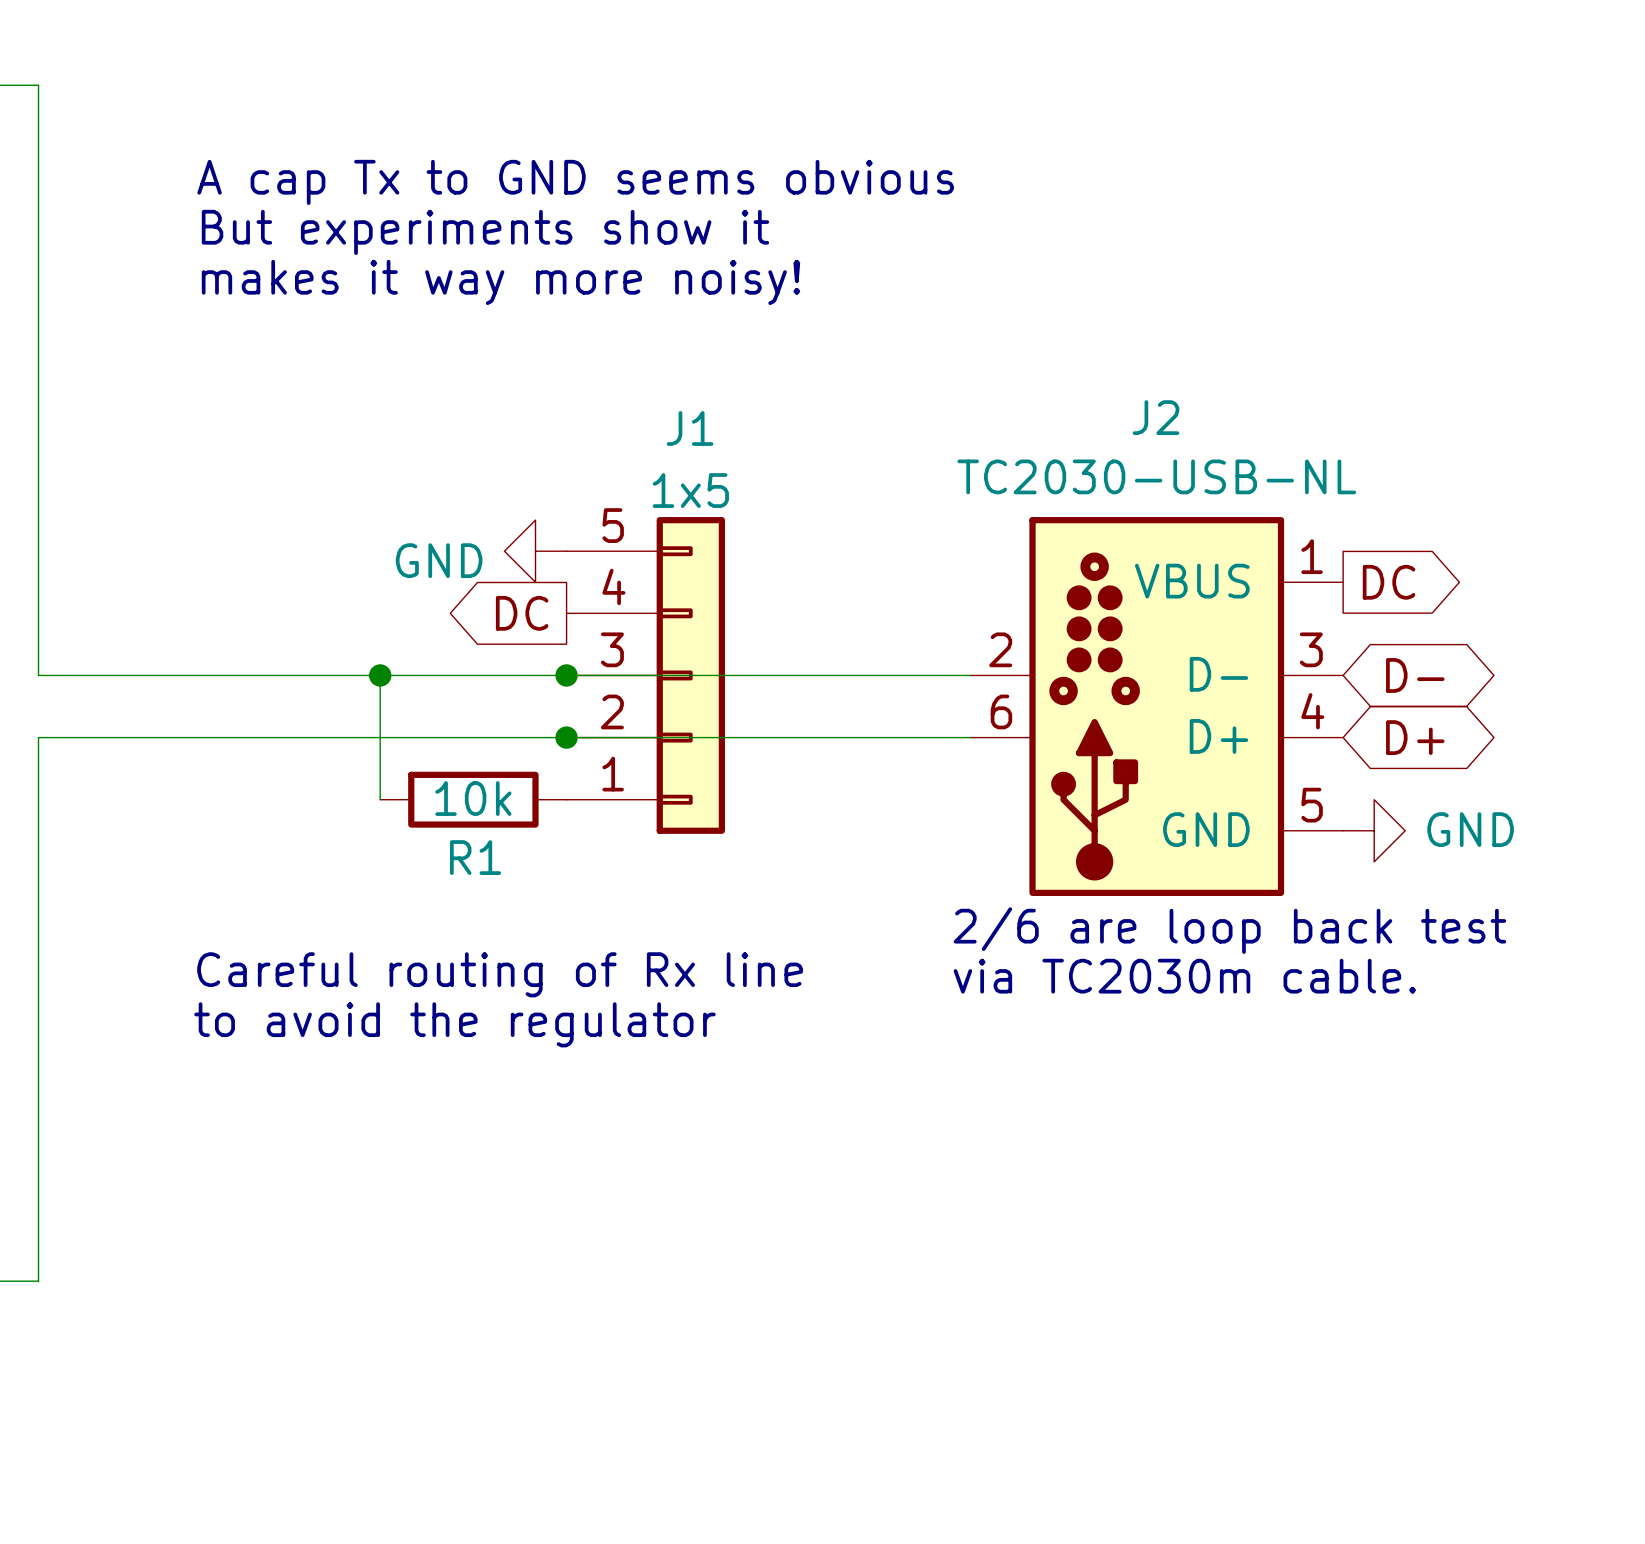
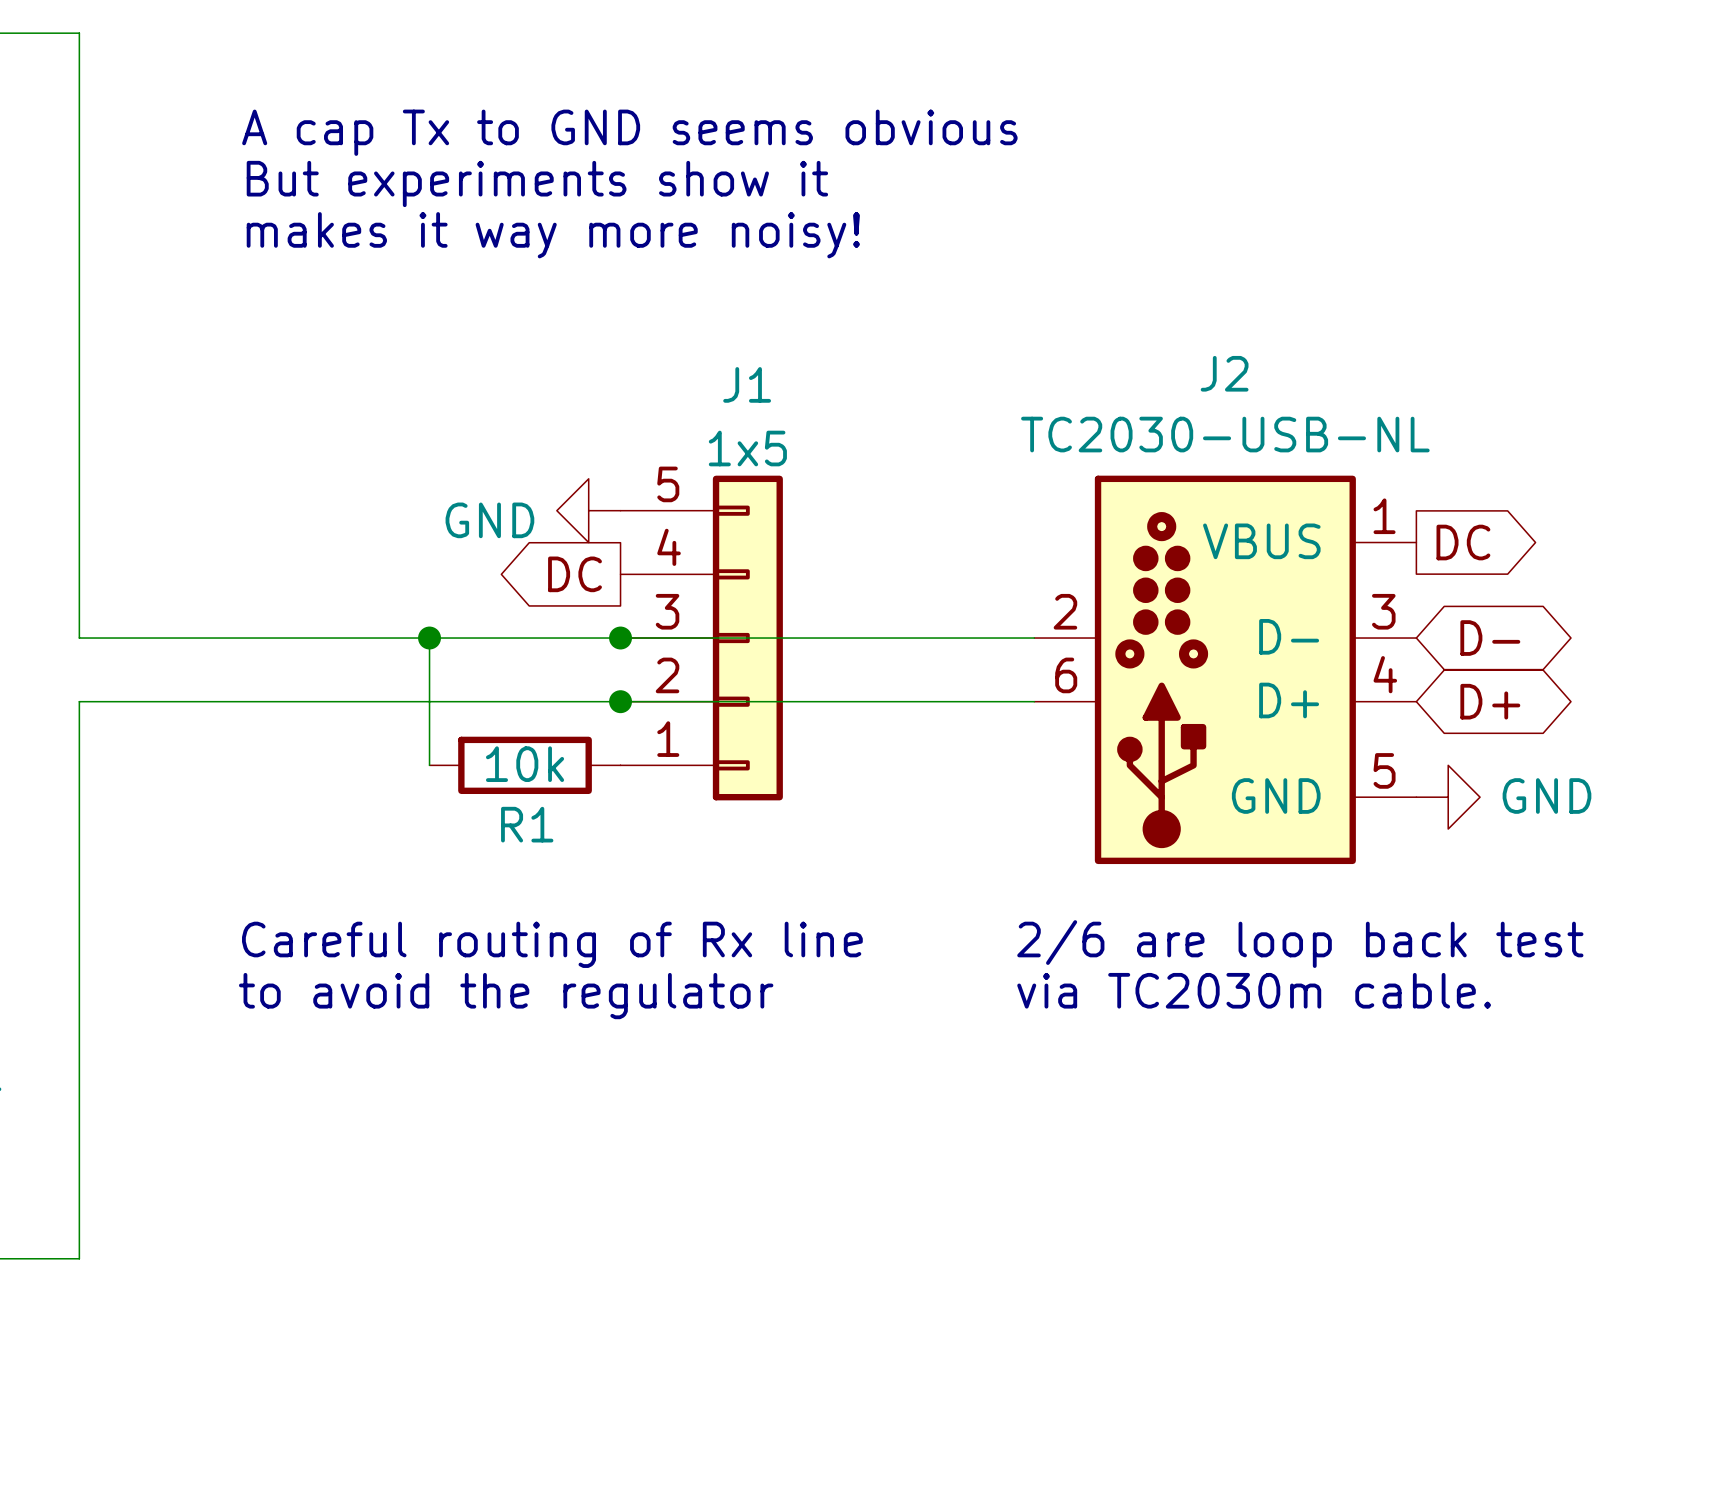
text: 2/6 are loop back test (1229, 930) -> none
text: via TC2030m cable. (1184, 976) -> 2/6 are loop back test (1300, 944)
text: none -> via TC2030m cable. (1254, 990)

